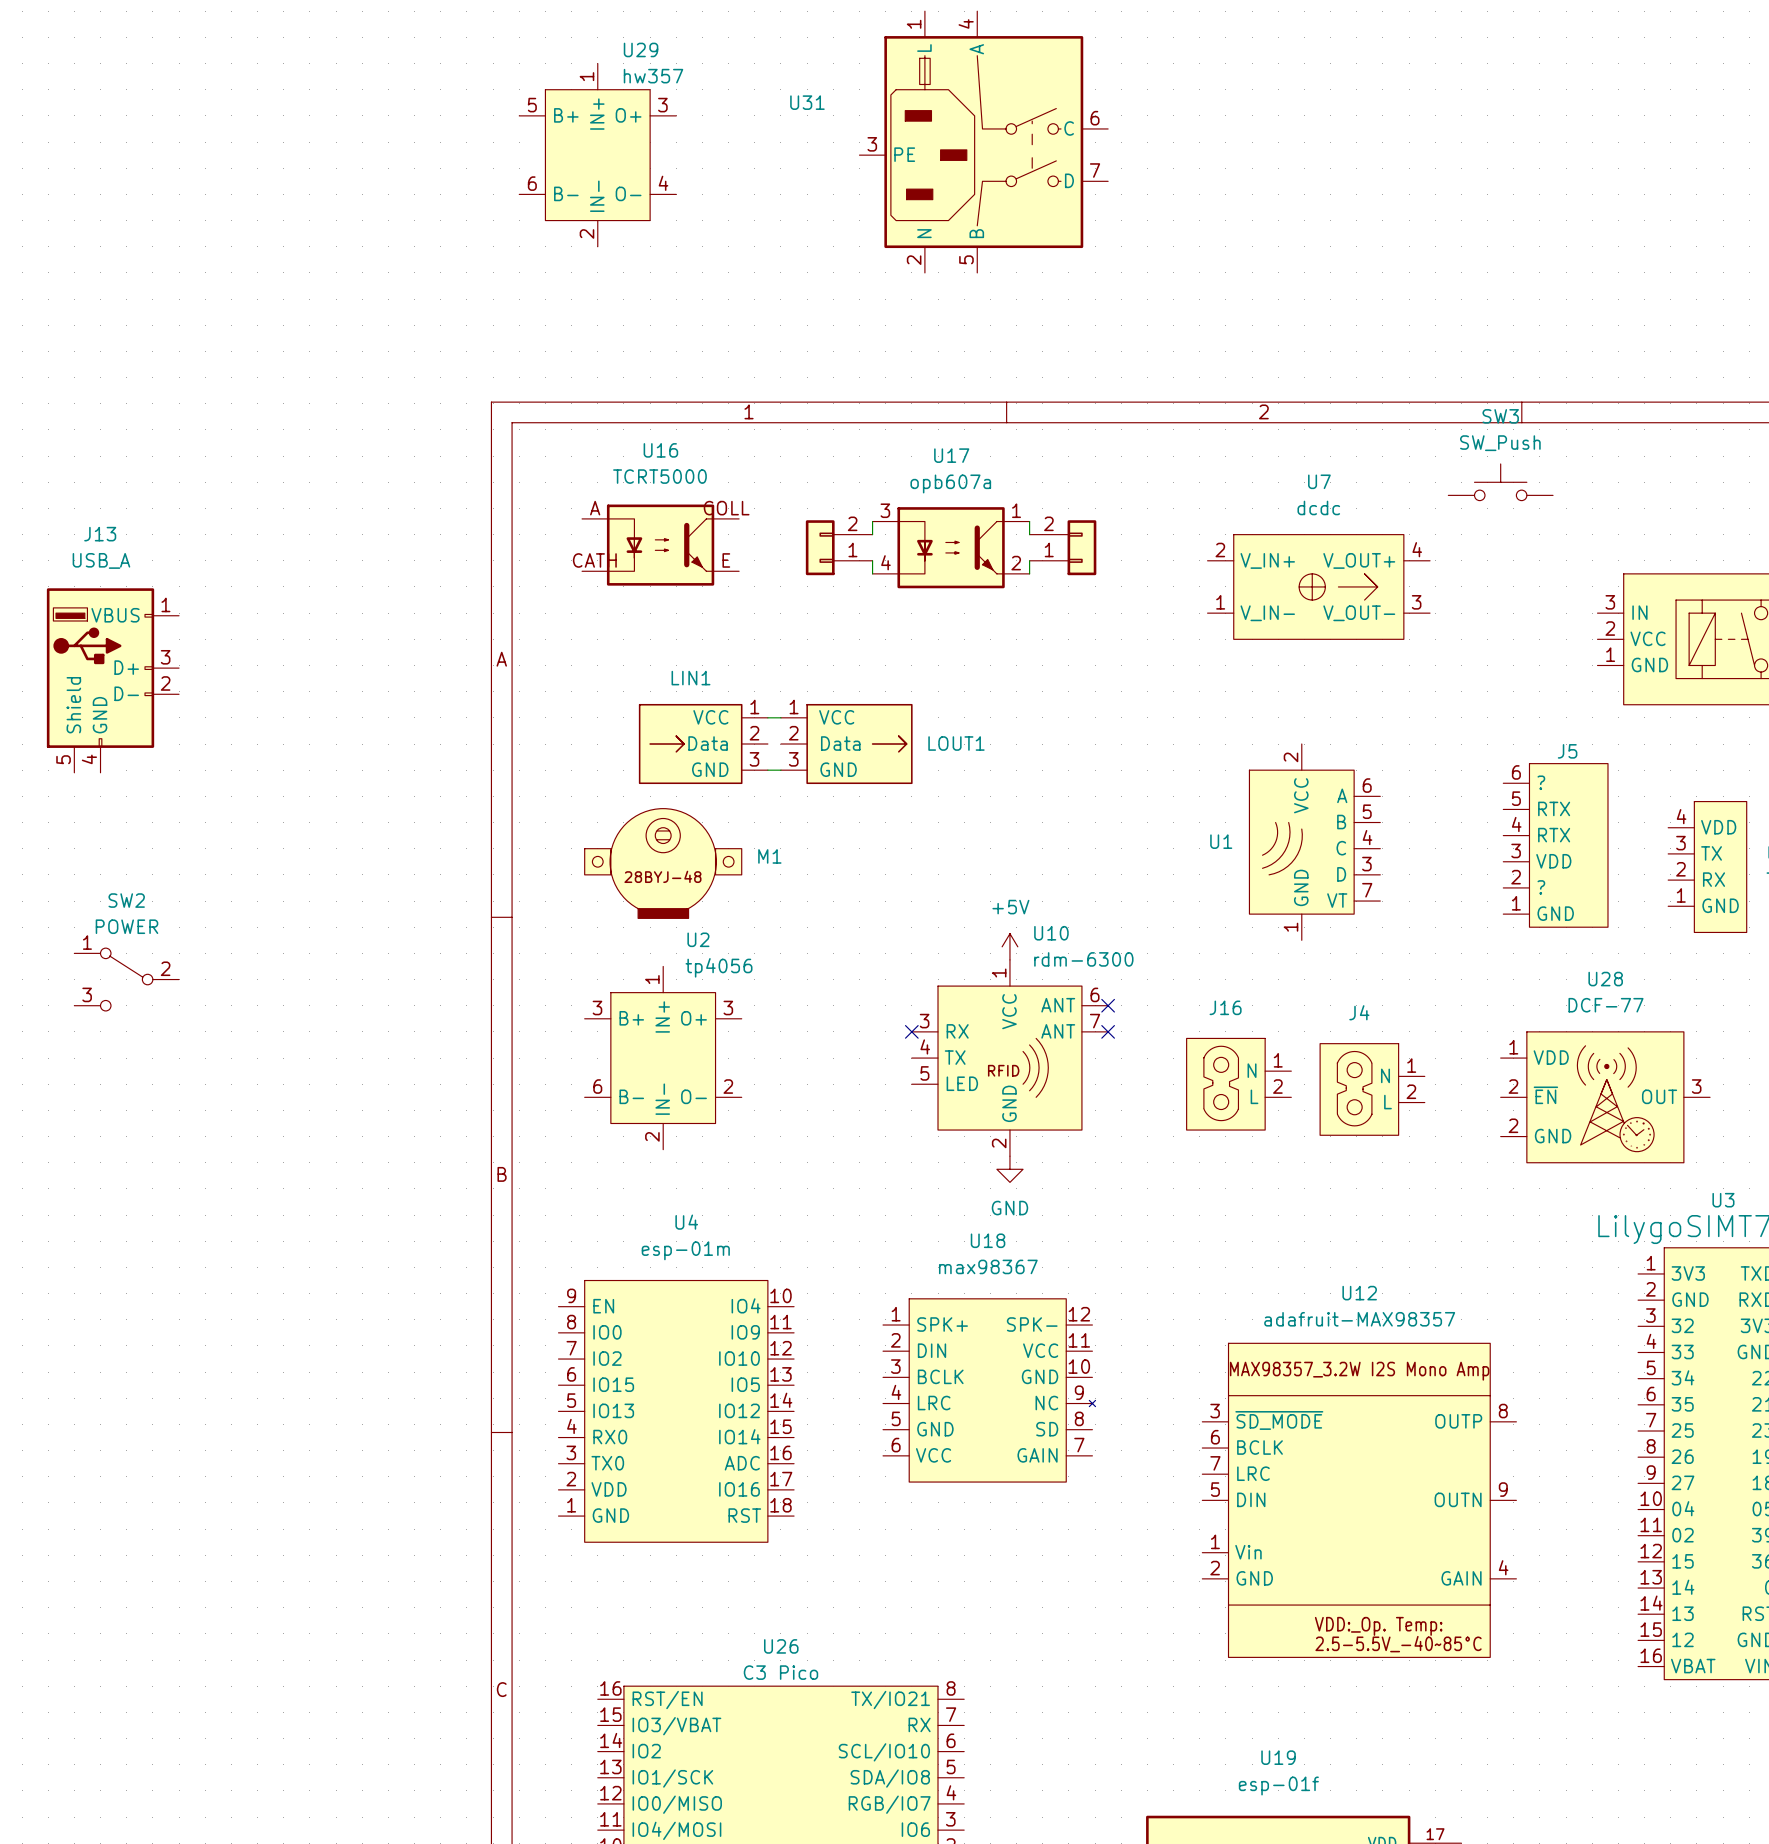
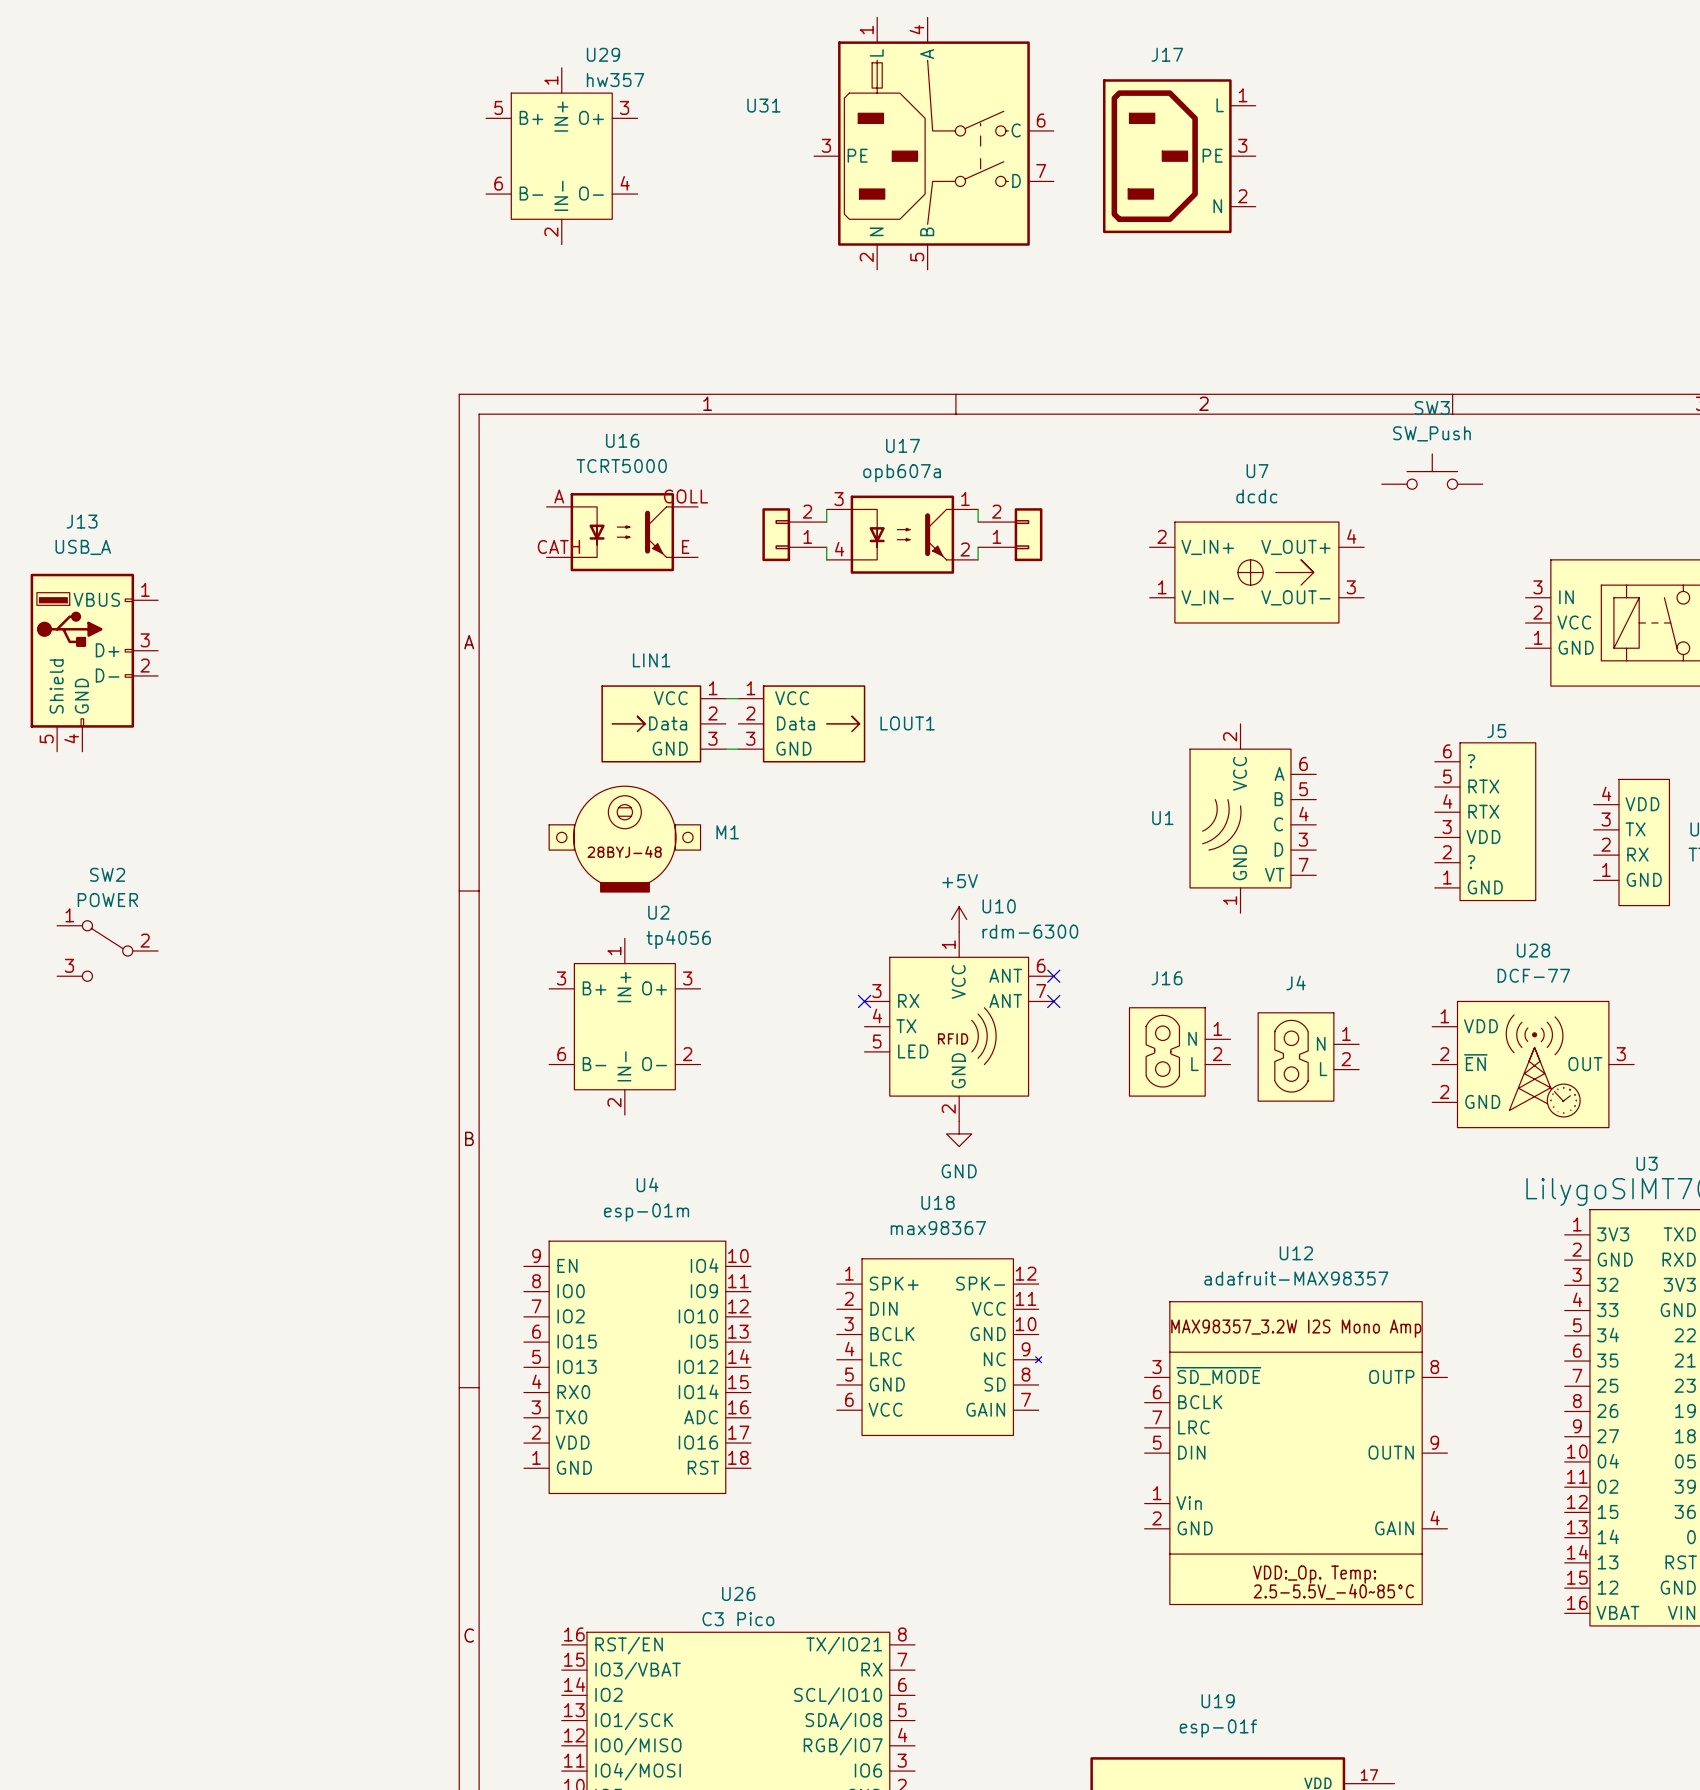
J17: none -> (1179, 156)

